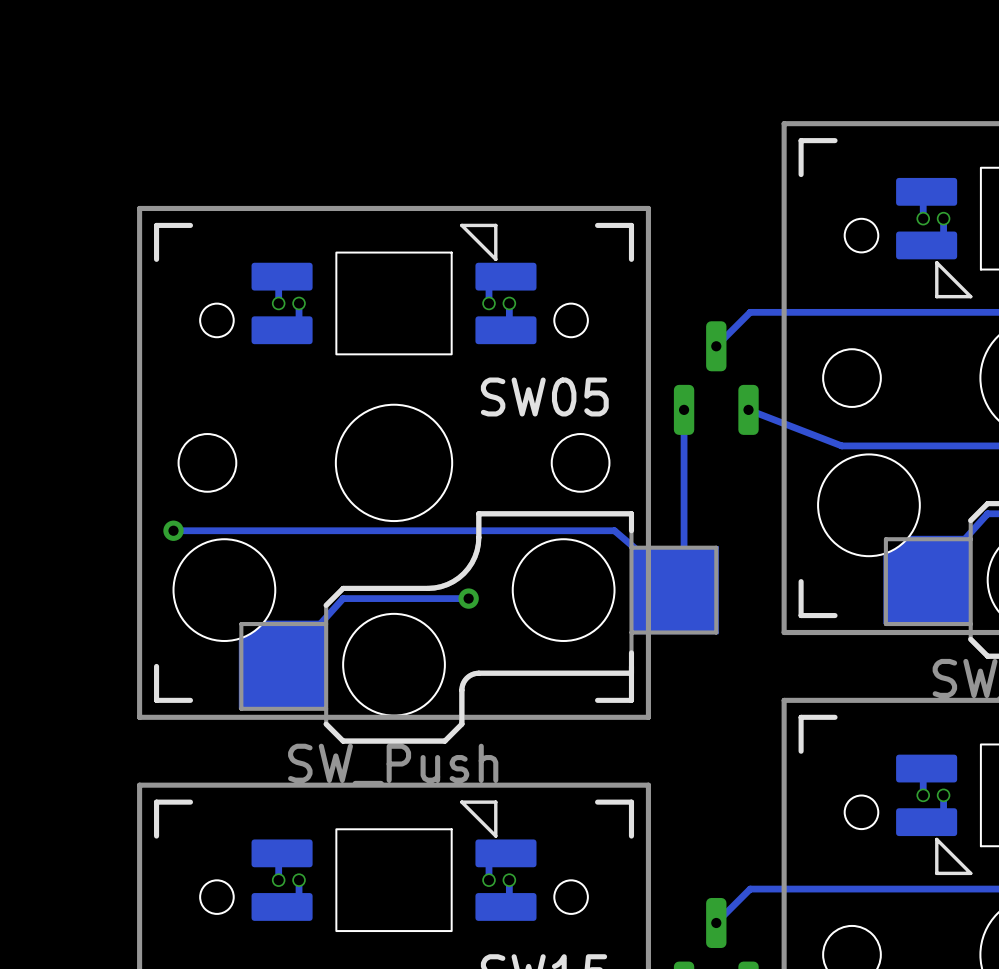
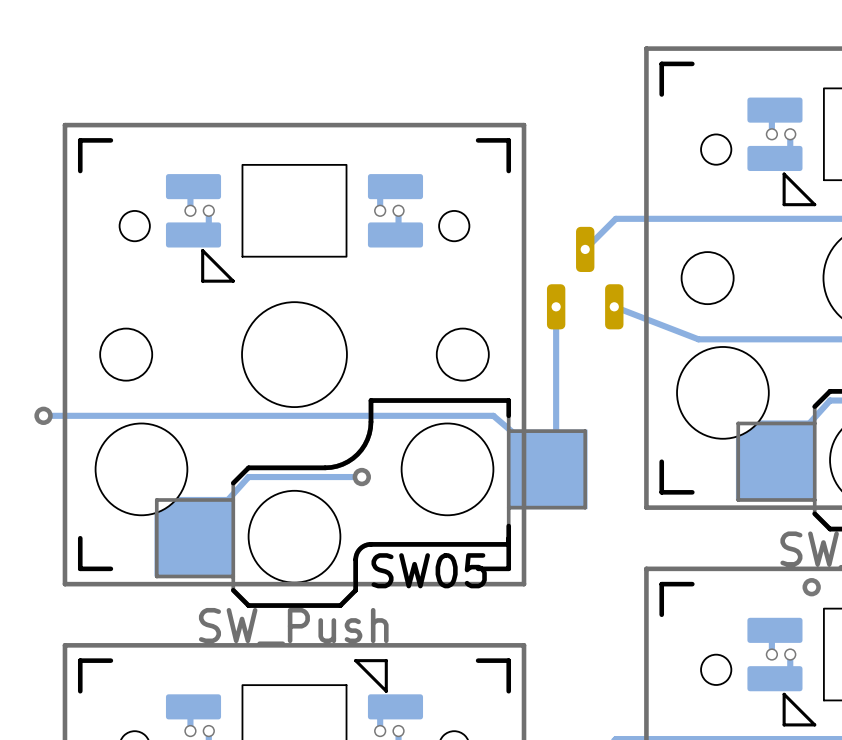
part rotation: 0° (394, 289) -> 180° (294, 223)
SW05 name position: SW05 (544, 397) -> SW05 (429, 570)
track: none -> (95, 415) (43, 415)
via position: (173, 530) -> (43, 415)
via: none -> (811, 587)

